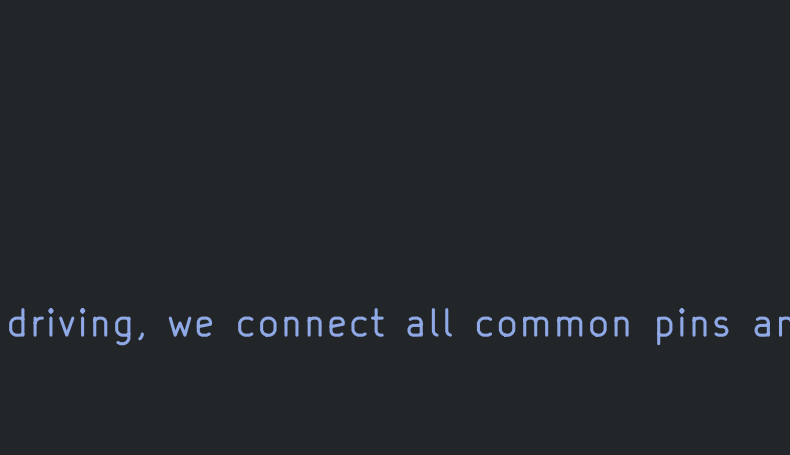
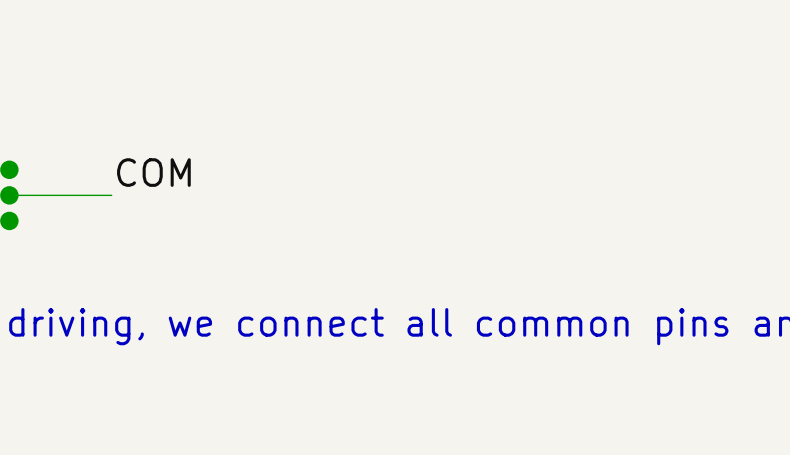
junction: none -> (9, 169)
label: none -> COM (153, 172)
wire: none -> (9, 195) (111, 195)
junction: none -> (9, 195)
junction: none -> (9, 220)

